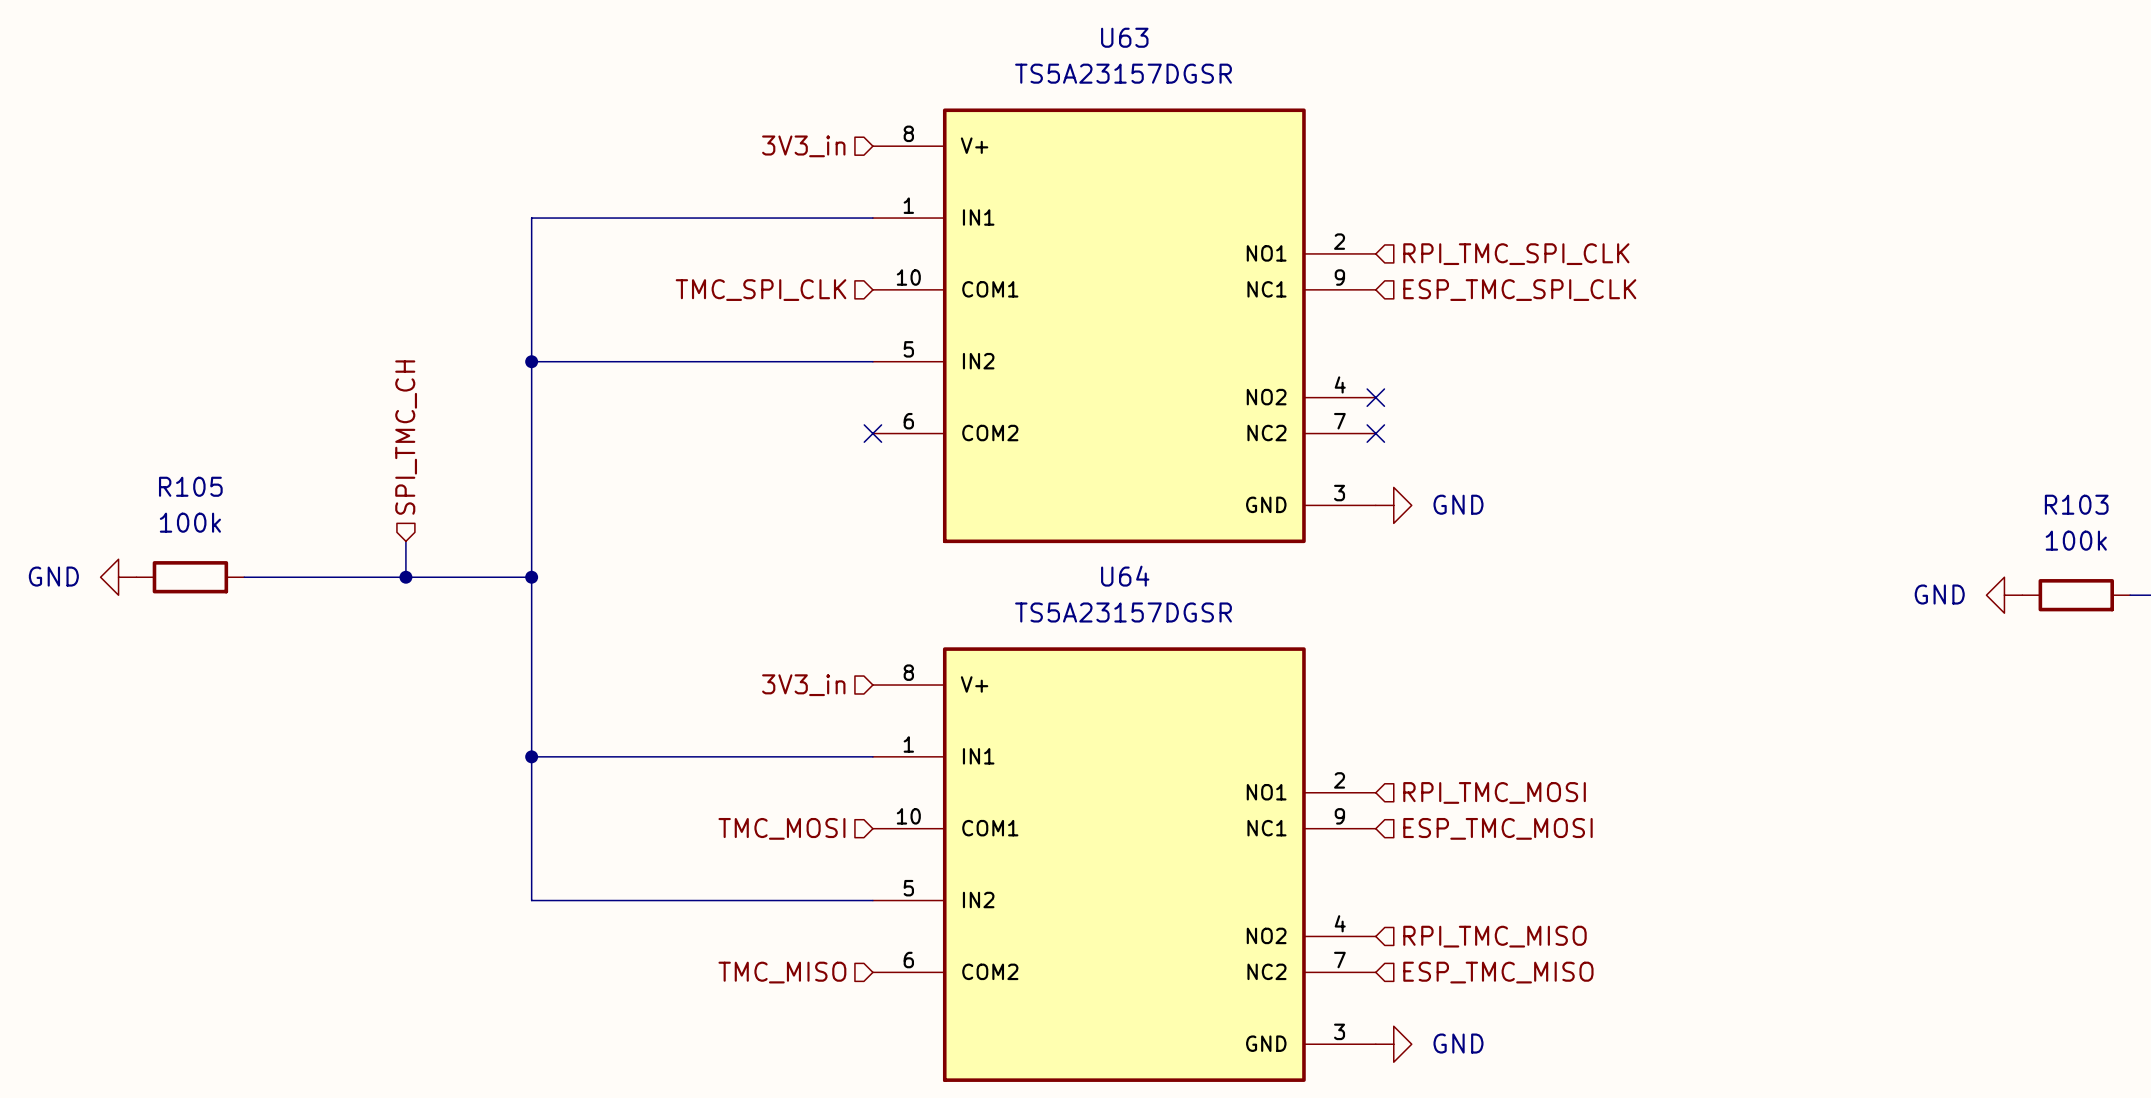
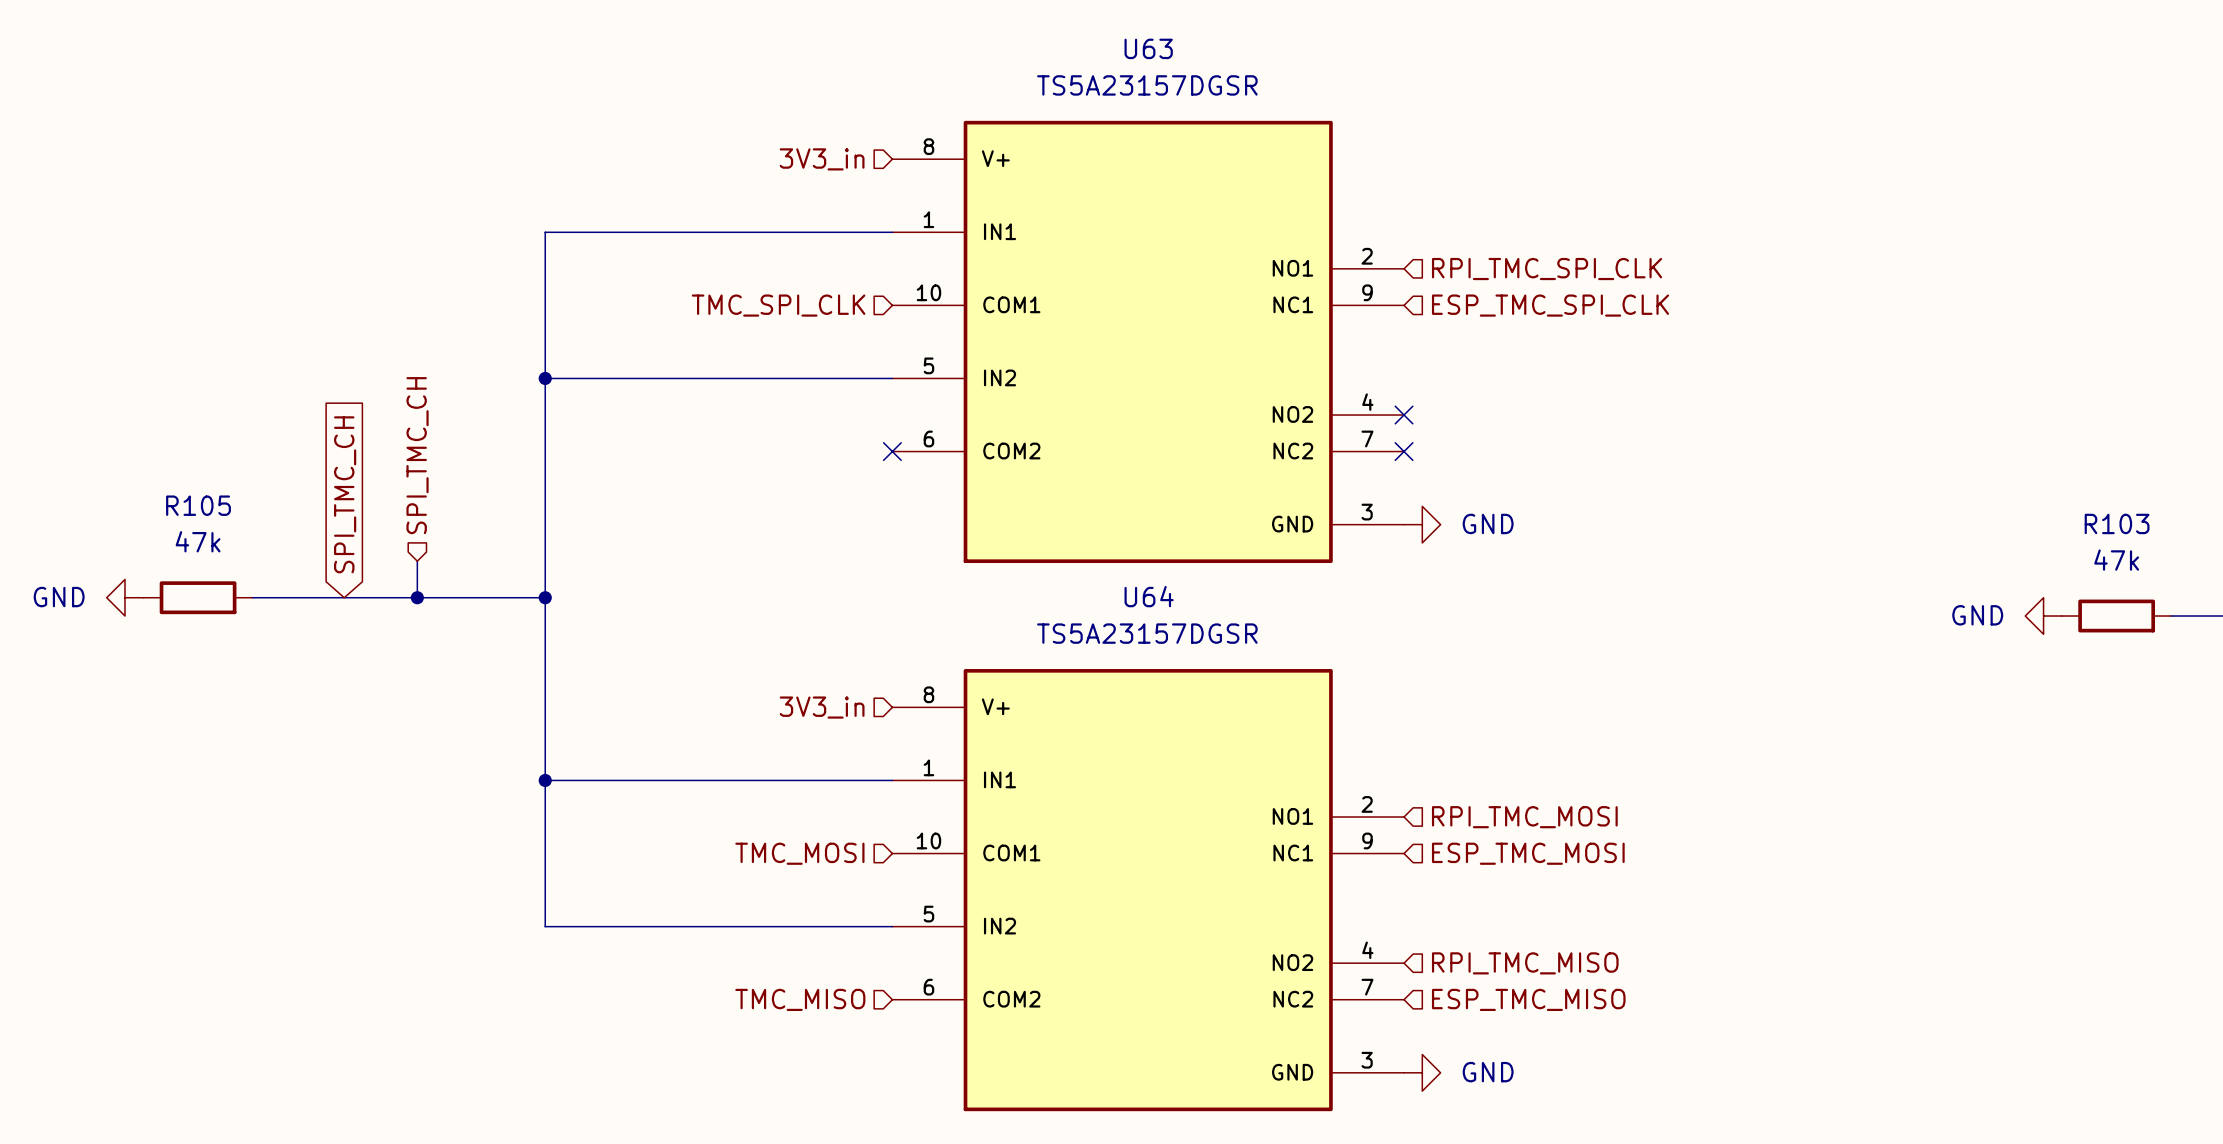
global label: none -> SPI_TMC_CH (345, 494)
R105 value: 100k (190, 522) -> 47k (198, 541)
R103 value: 100k (2076, 540) -> 47k (2116, 560)

